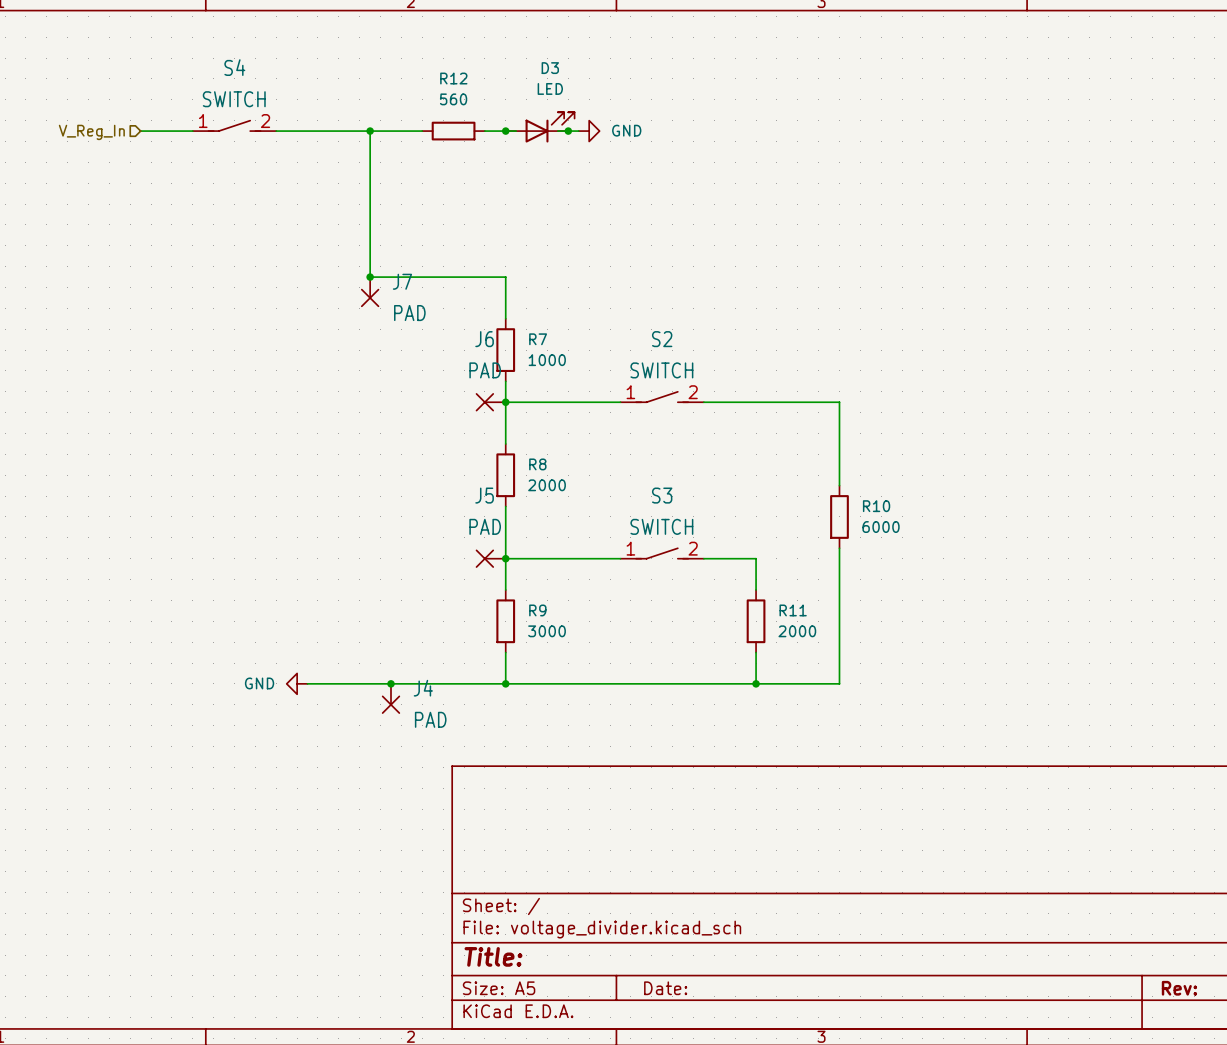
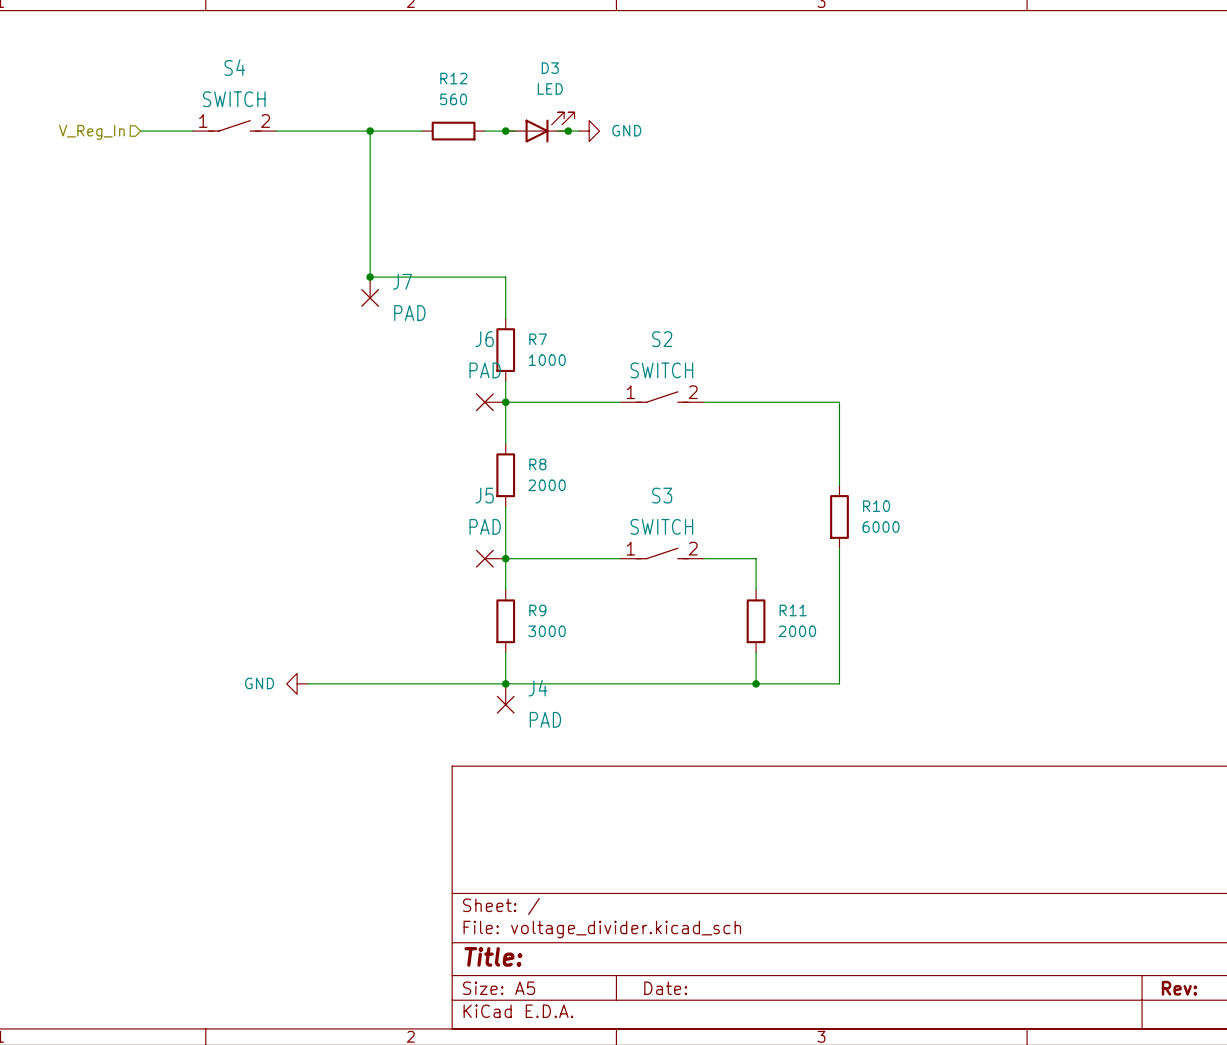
junction: (390, 683) -> none
J4 position: (390, 698) -> (505, 698)

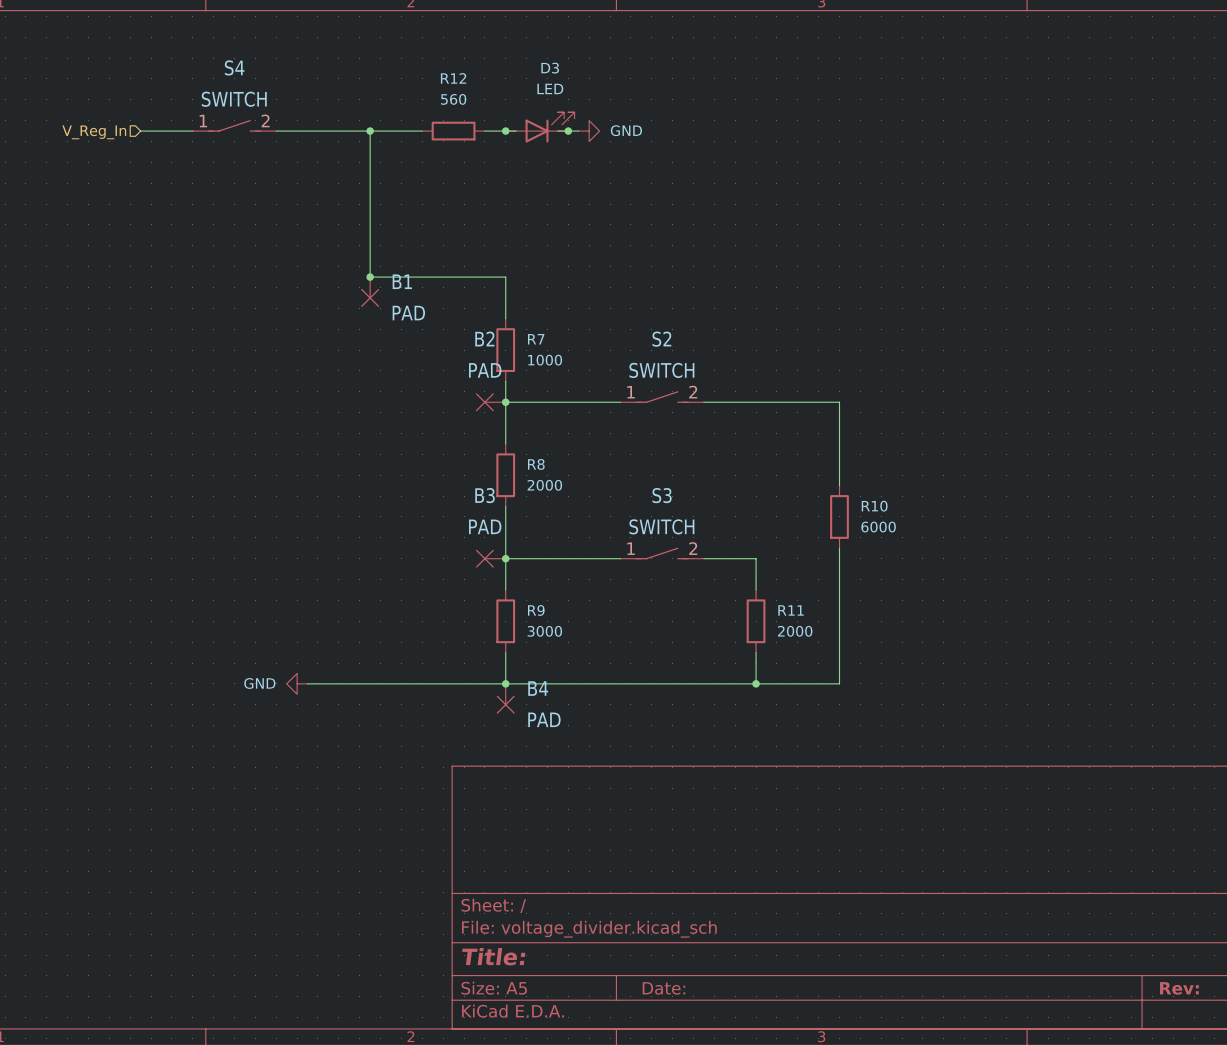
J7 name: J7 (402, 281) -> B1 (402, 281)
J6 name: J6 (484, 339) -> B2 (484, 338)
J5 name: J5 (484, 495) -> B3 (485, 495)
J4 name: J4 (538, 688) -> B4 (538, 688)

